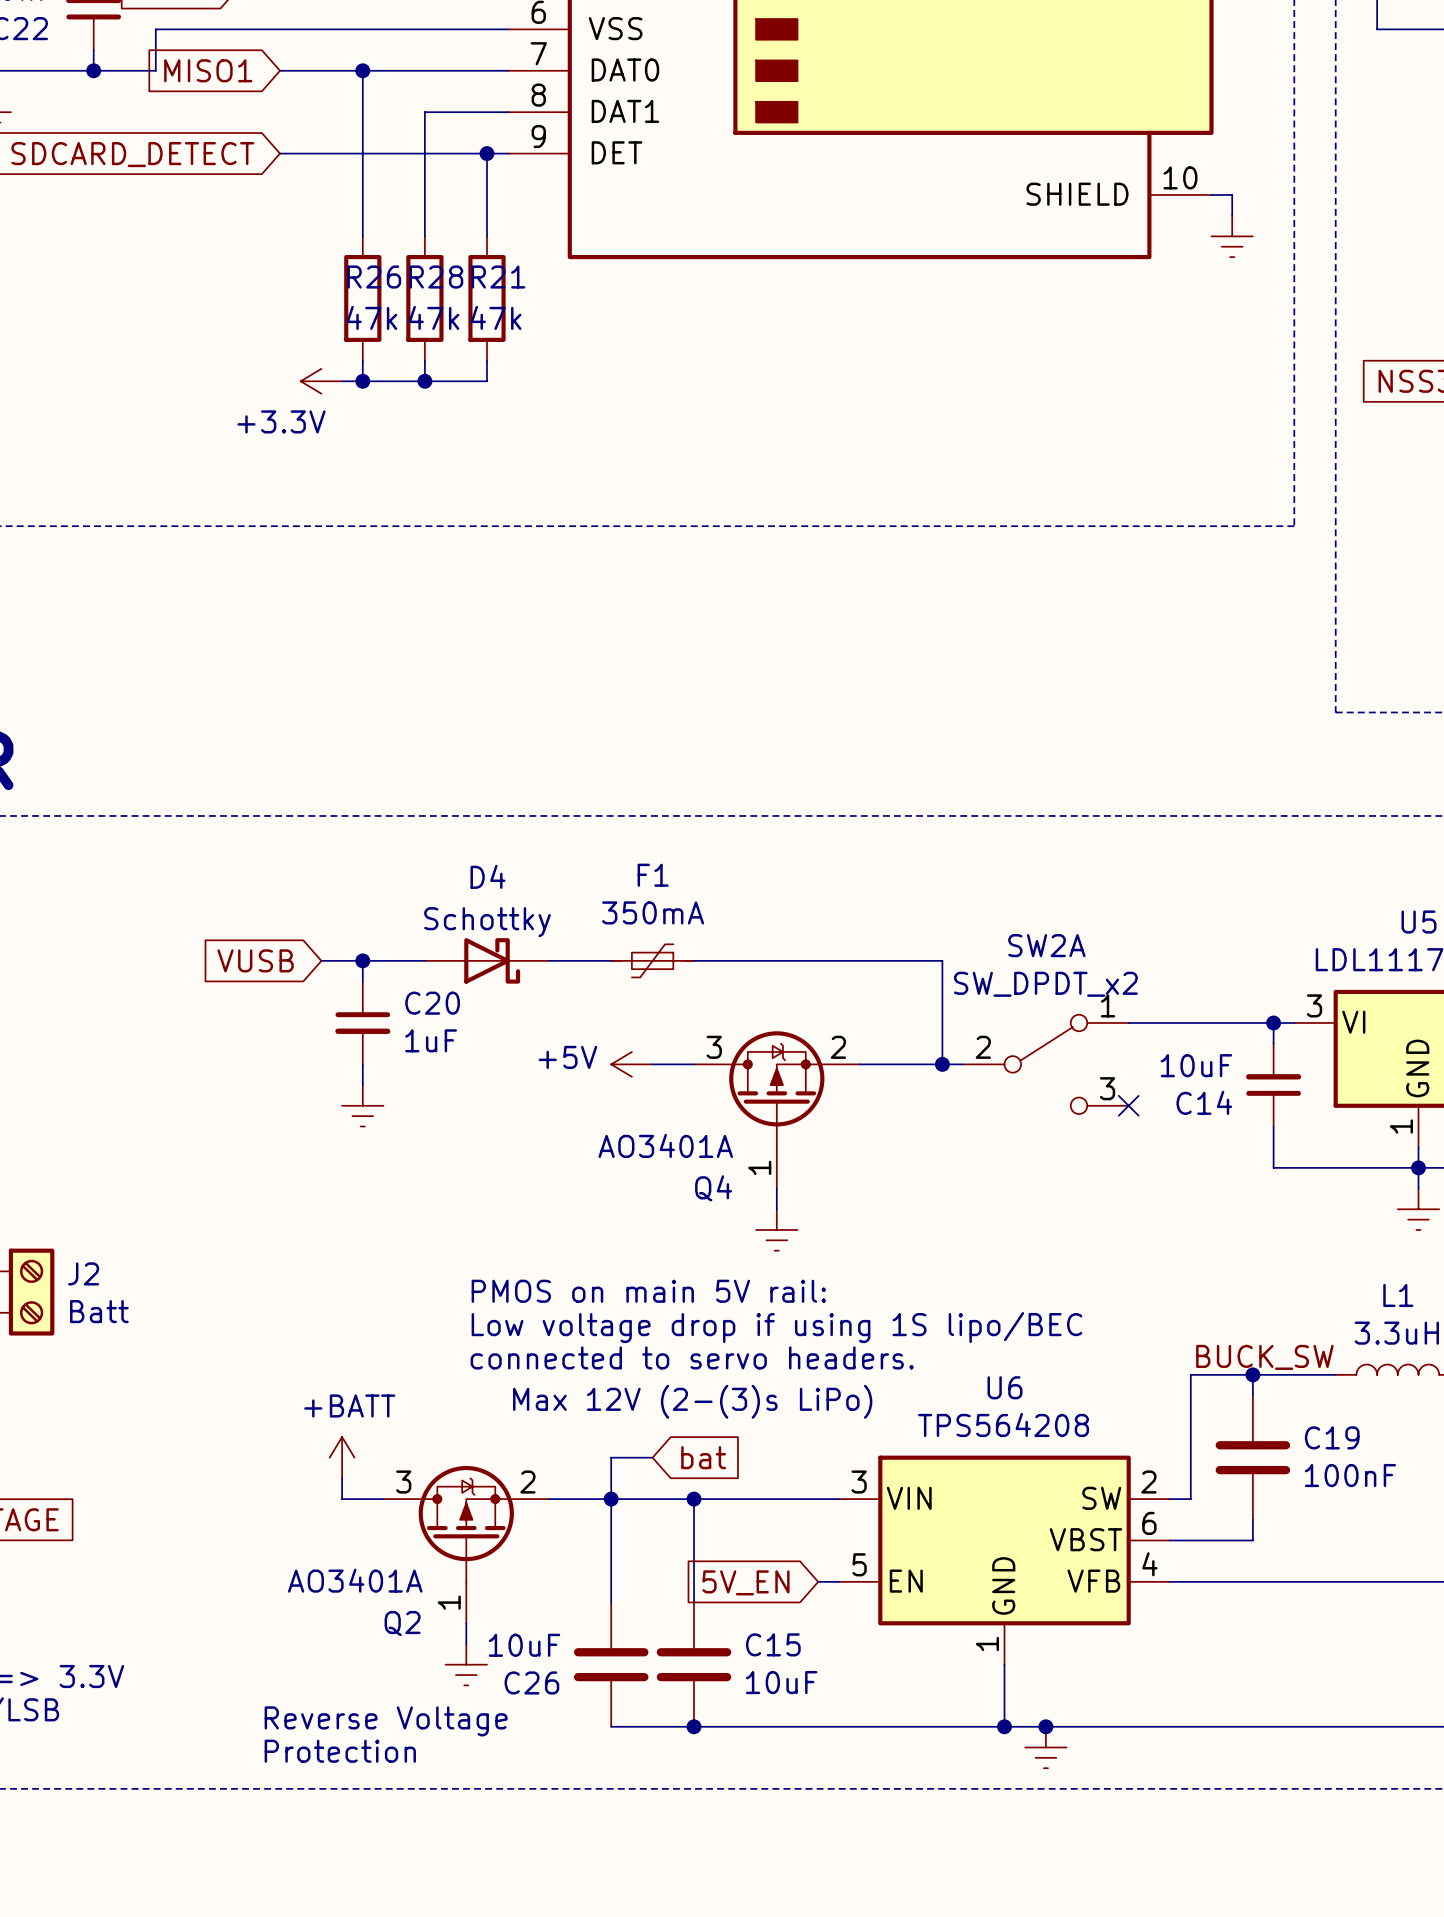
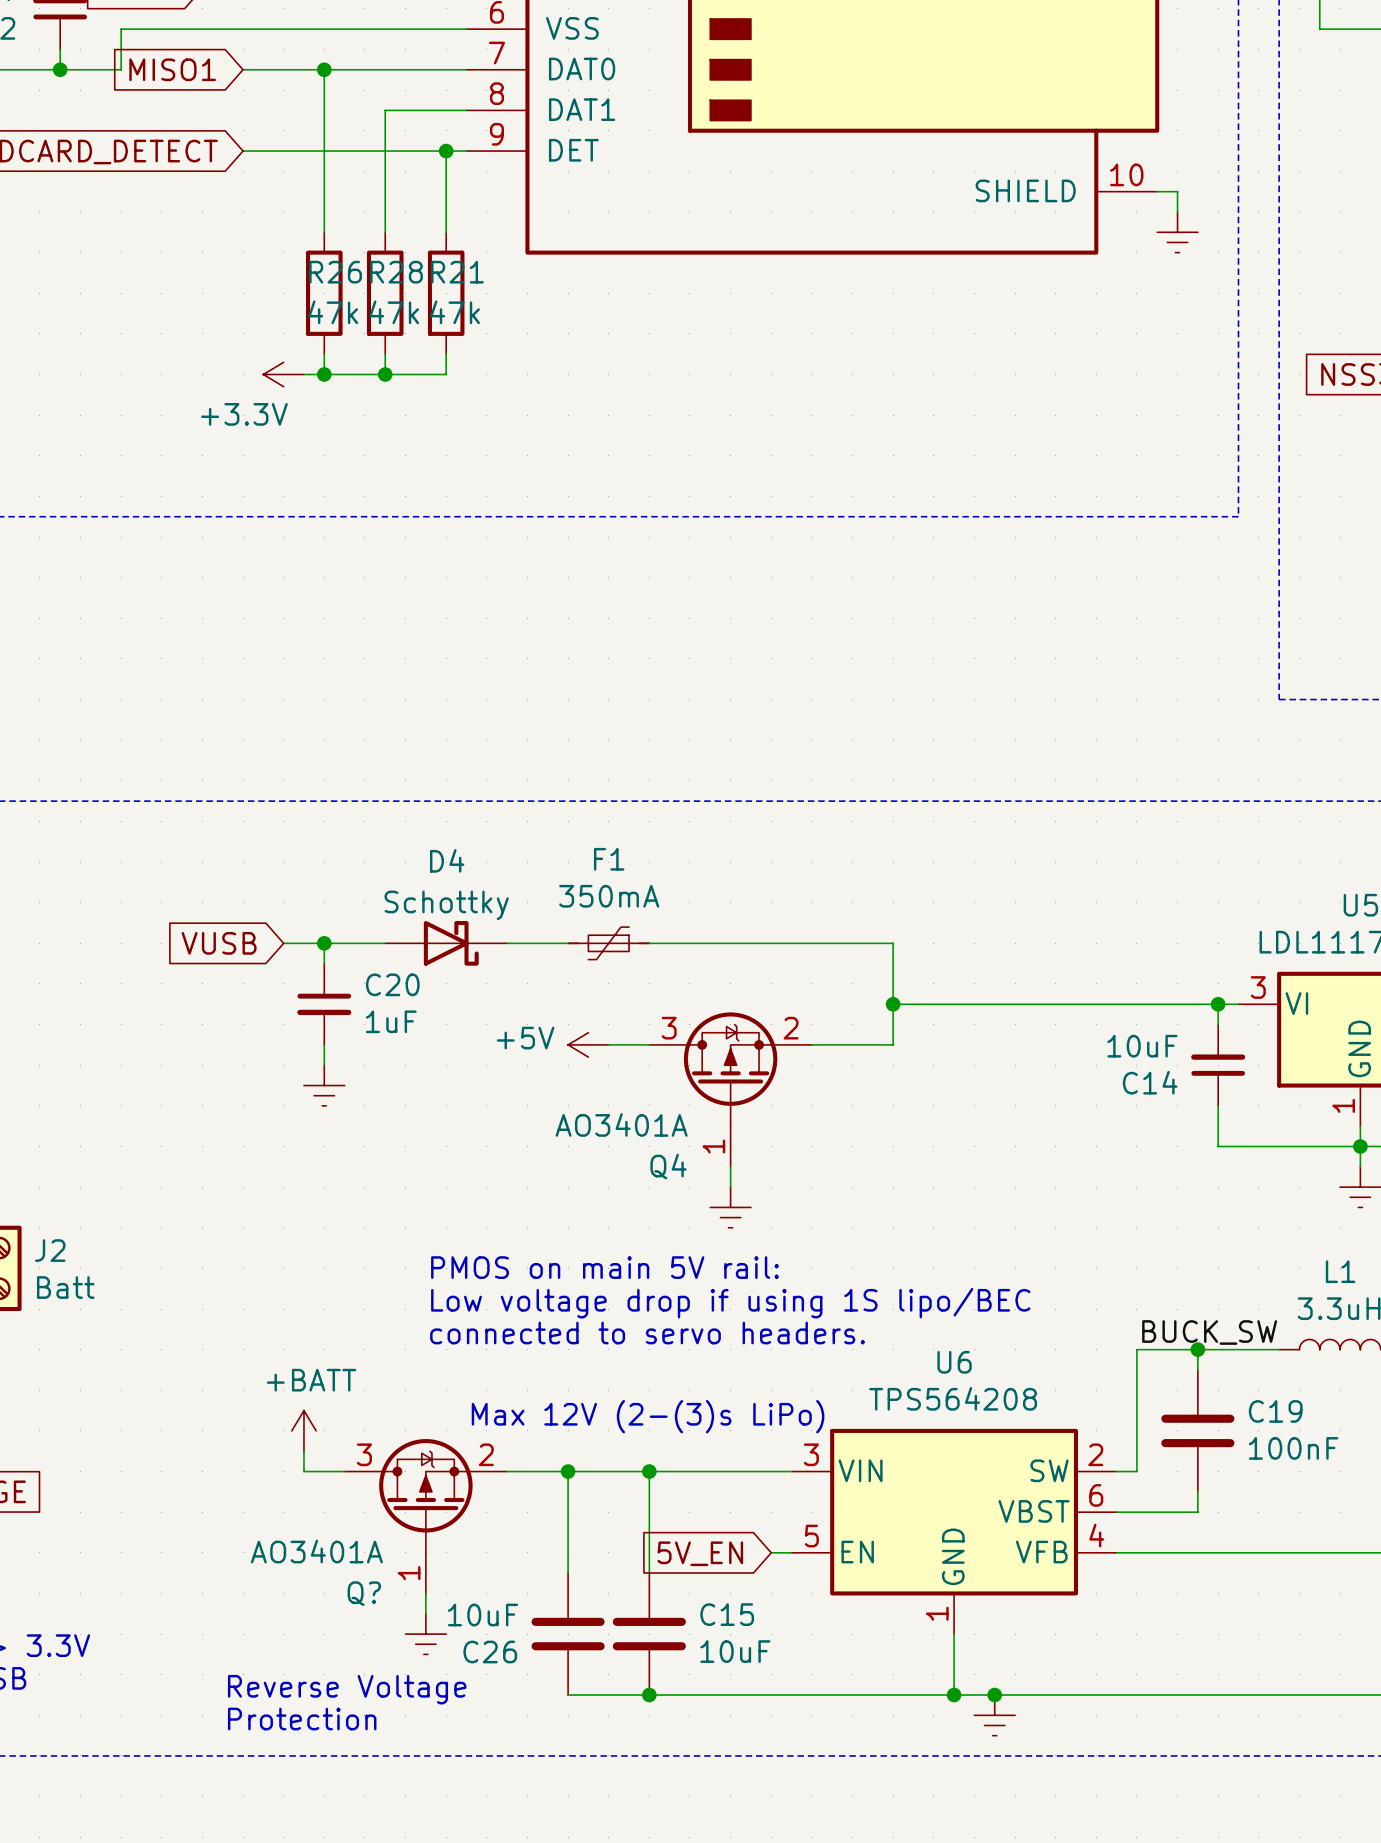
wire: none -> (893, 1004) (1075, 1004)
wire: (942, 1064) (963, 1064) -> none
junction position: (942, 1064) -> (893, 1004)
SW2A: SW_DPDT_x2 (1045, 1064) -> none
no-connect mark: (1128, 1105) -> none
text position: Max 12V (2-(3)s LiPo) (692, 1401) -> Max 12V (2-(3)s LiPo) (648, 1416)
wire: (652, 1457) (611, 1457) (611, 1499) -> none
global label: bat (703, 1457) -> none
Q2 name: Q2 (402, 1623) -> Q? (364, 1593)

